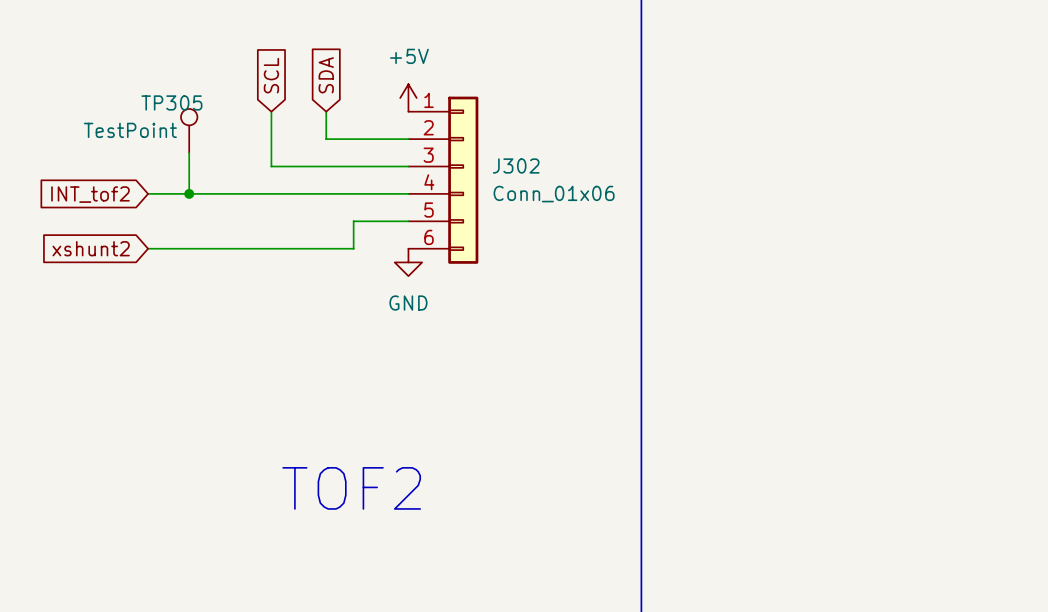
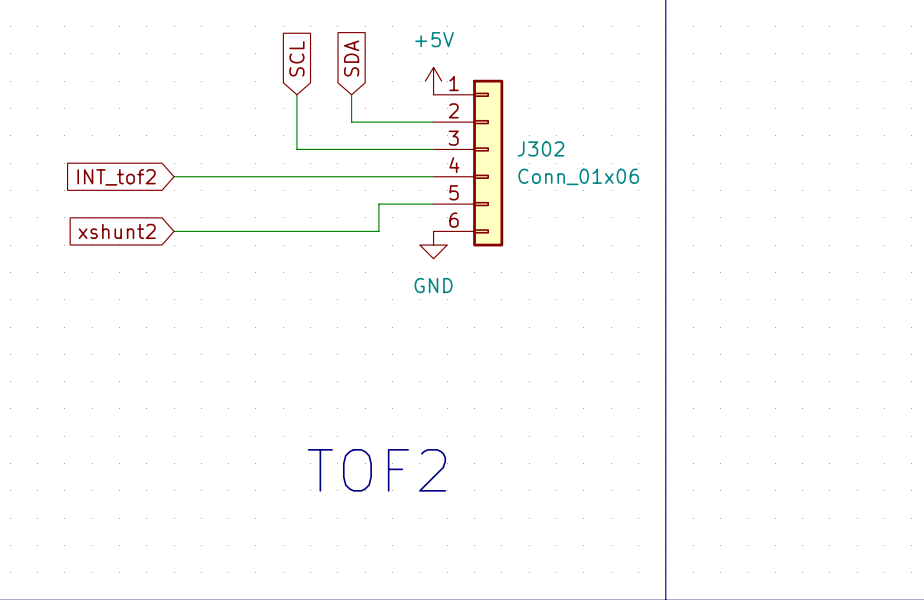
TP305: TestPoint (189, 130) -> none
wire: (189, 152) (189, 193) -> none
junction: (189, 193) -> none

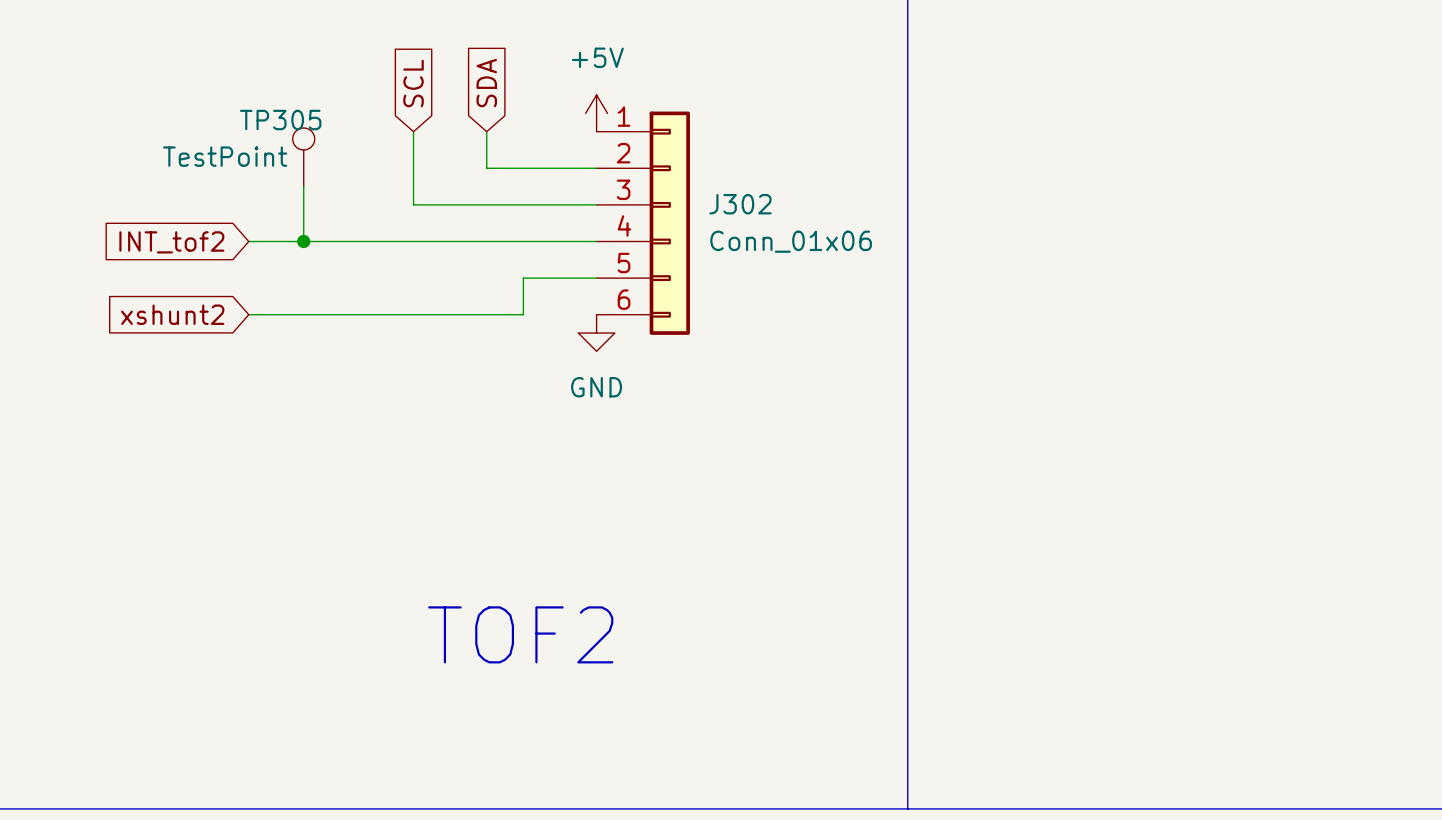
TP305: none -> TestPoint (303, 157)
wire: none -> (303, 186) (303, 241)
junction: none -> (303, 241)

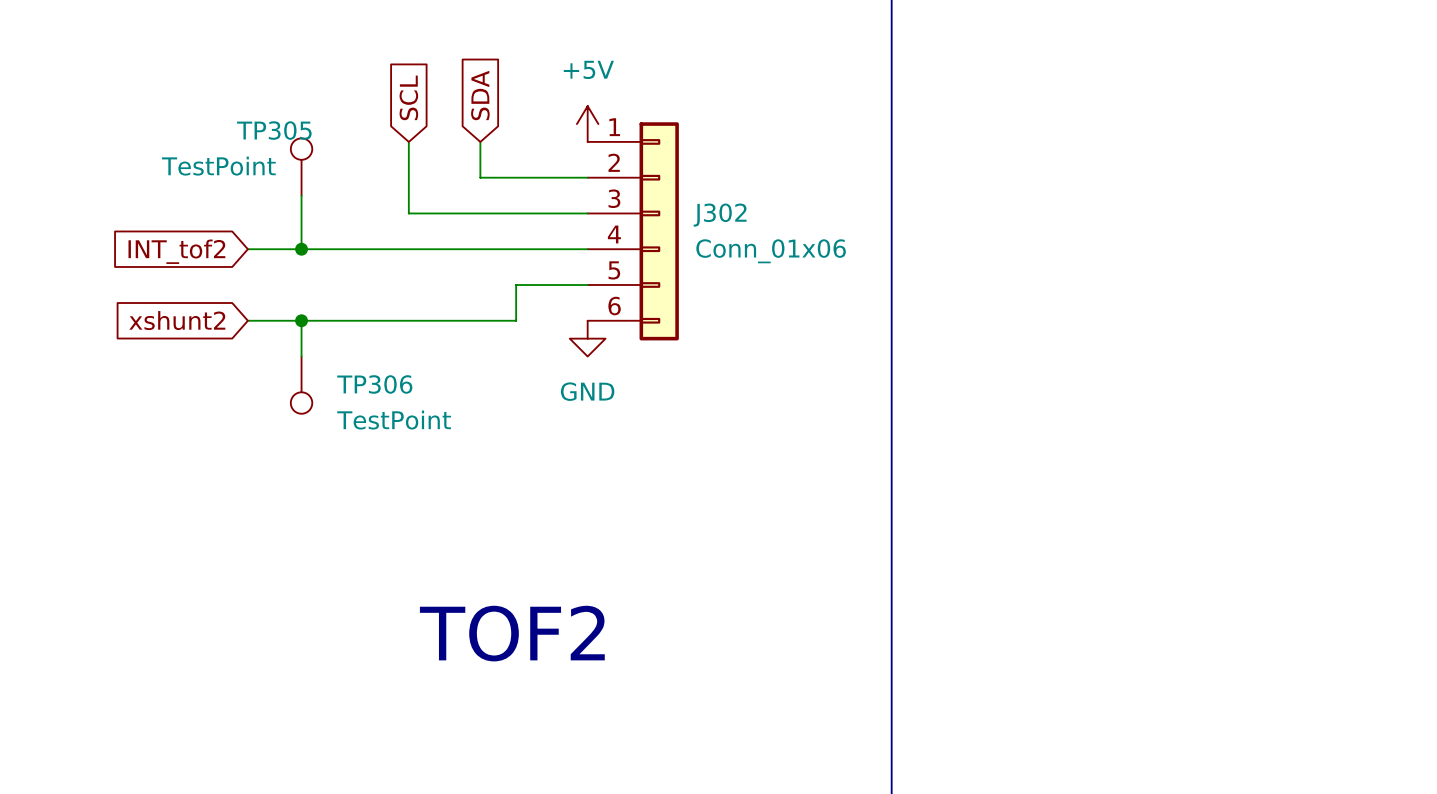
wire: none -> (301, 320) (301, 356)
junction: none -> (301, 320)
TP306: none -> TestPoint (301, 385)

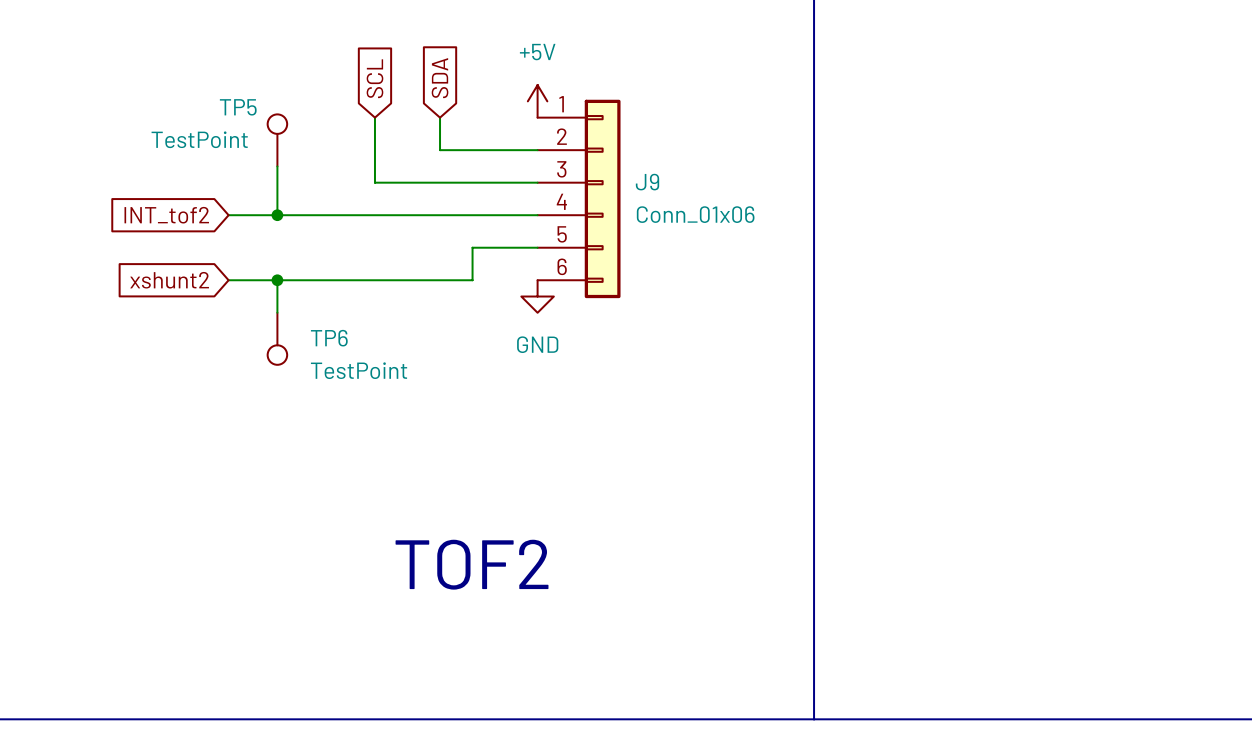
TP305 name: TP305 (274, 130) -> TP5 (238, 107)
J302 name: J302 (720, 215) -> J9 (647, 182)
TP306 name: TP306 (374, 384) -> TP6 (329, 338)

